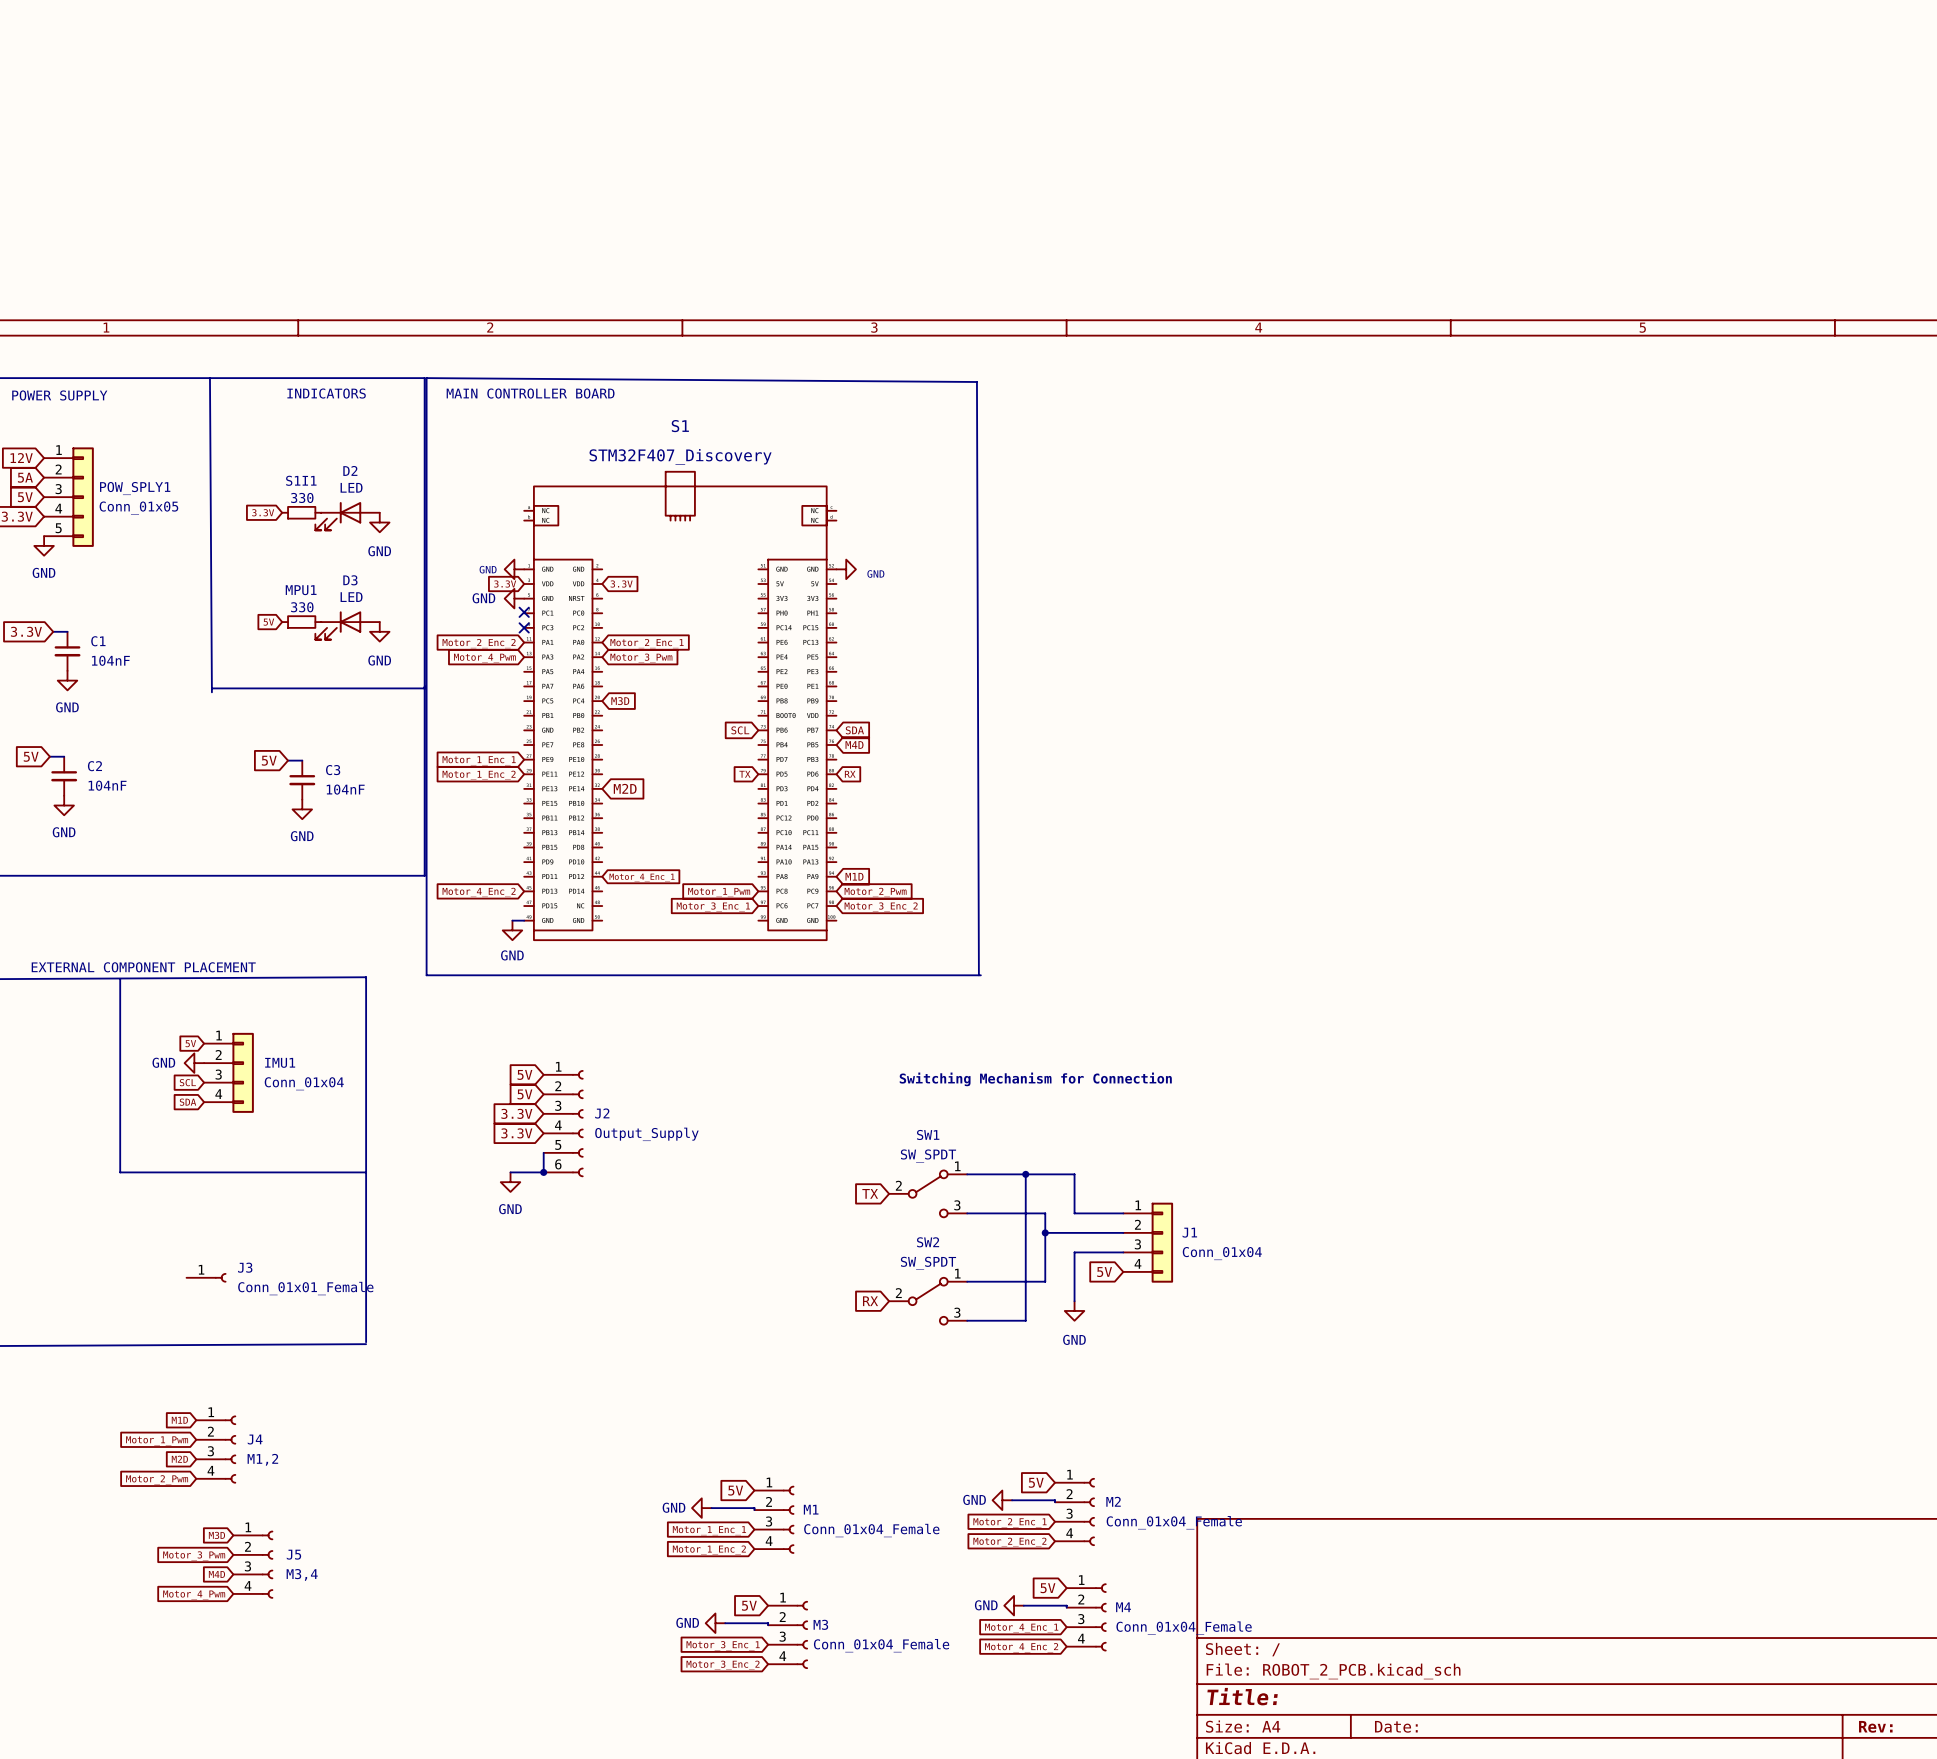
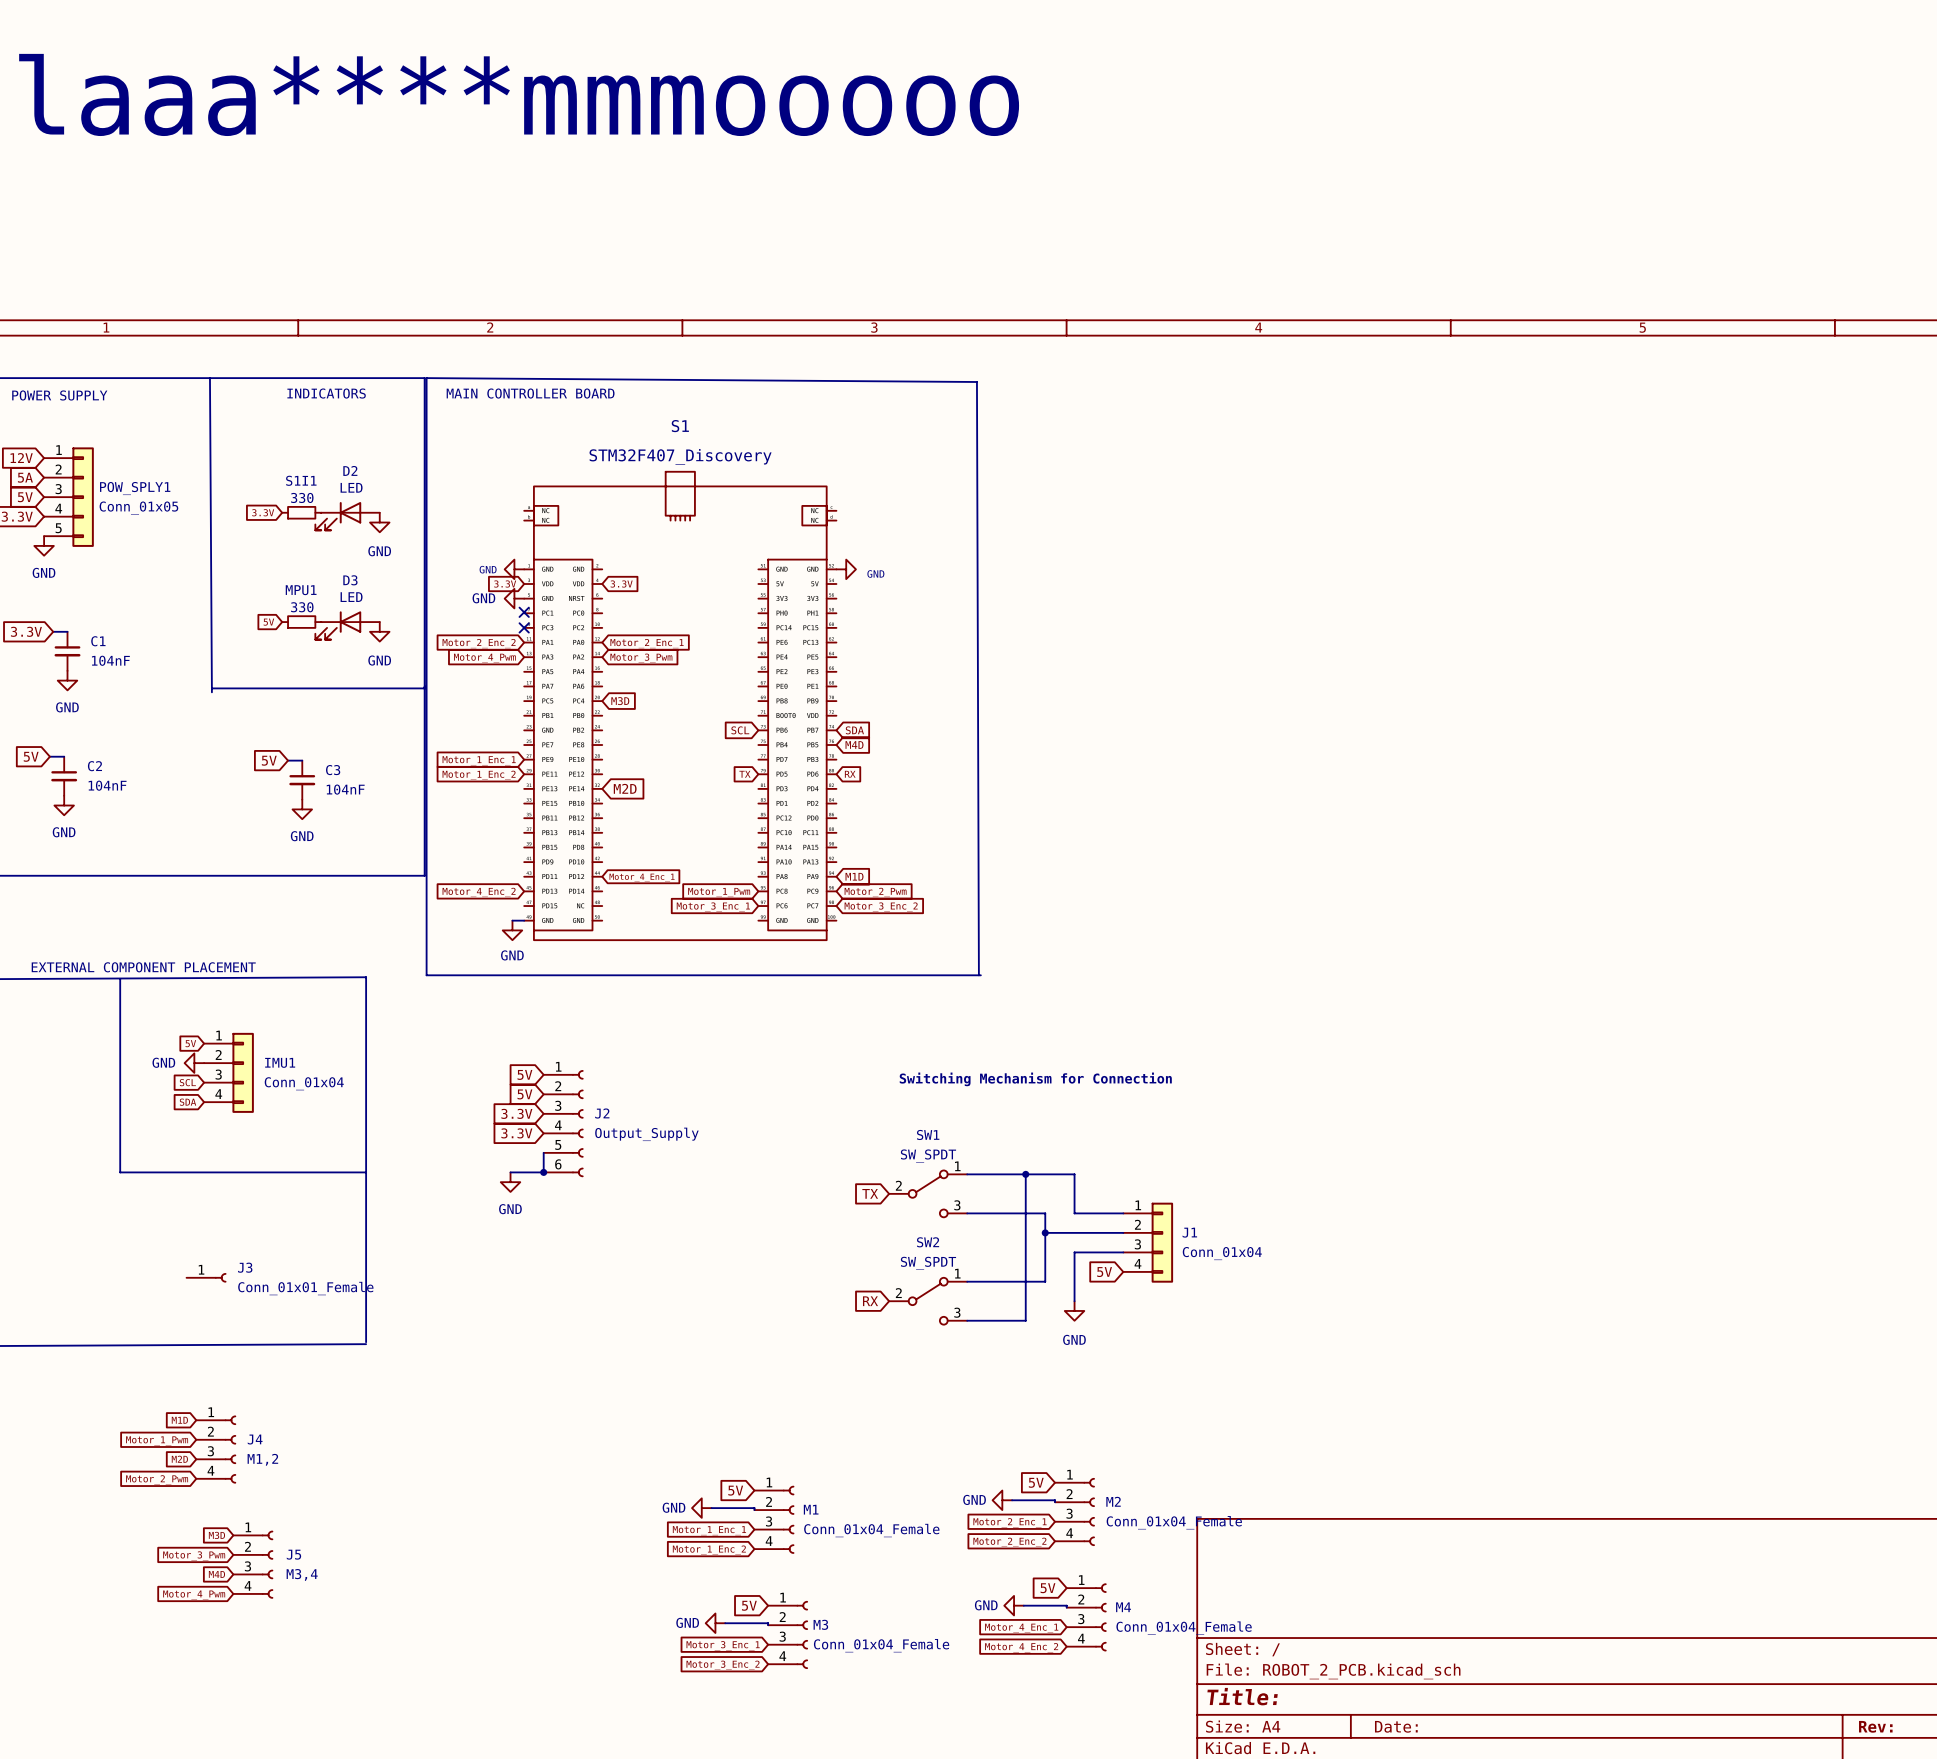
text: none -> laaa****mmmooooo (519, 94)

